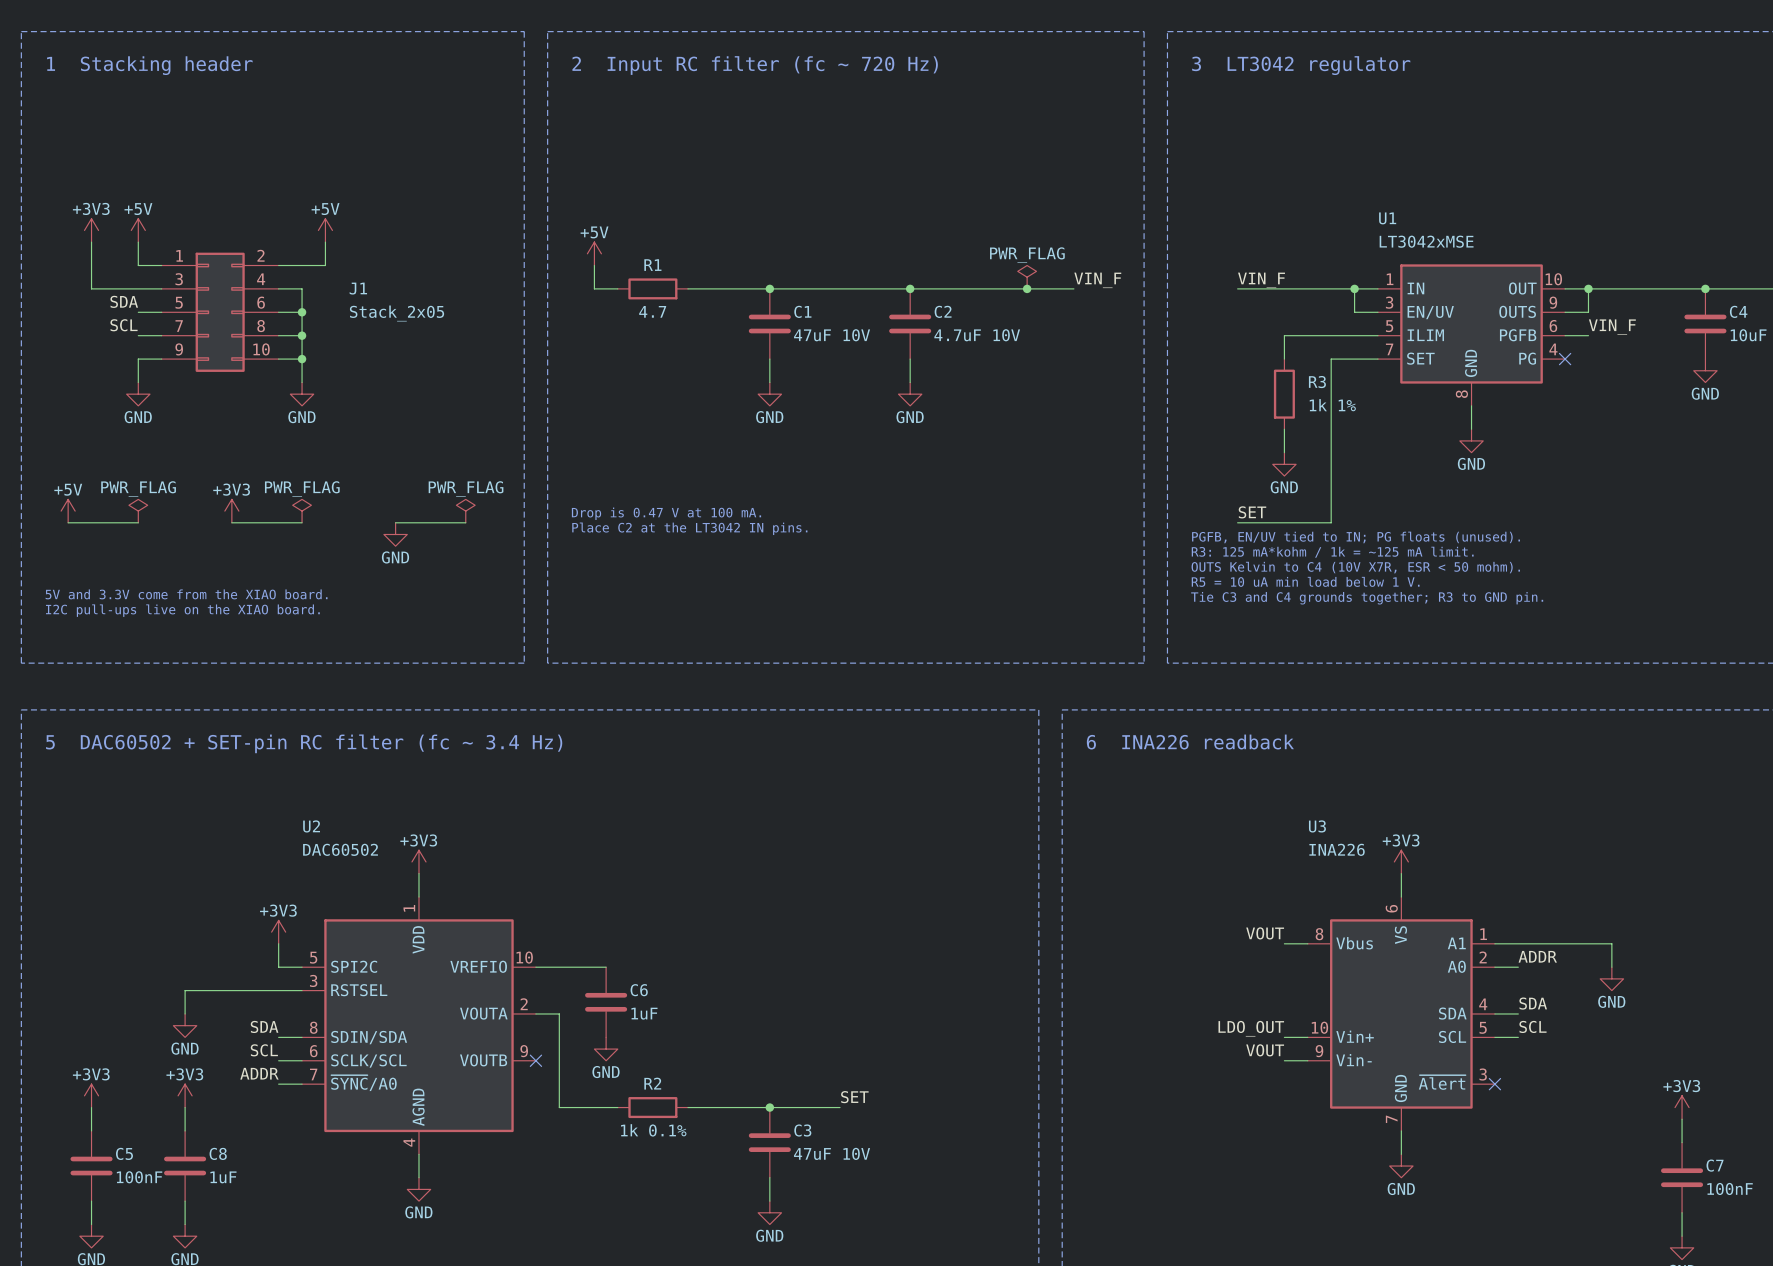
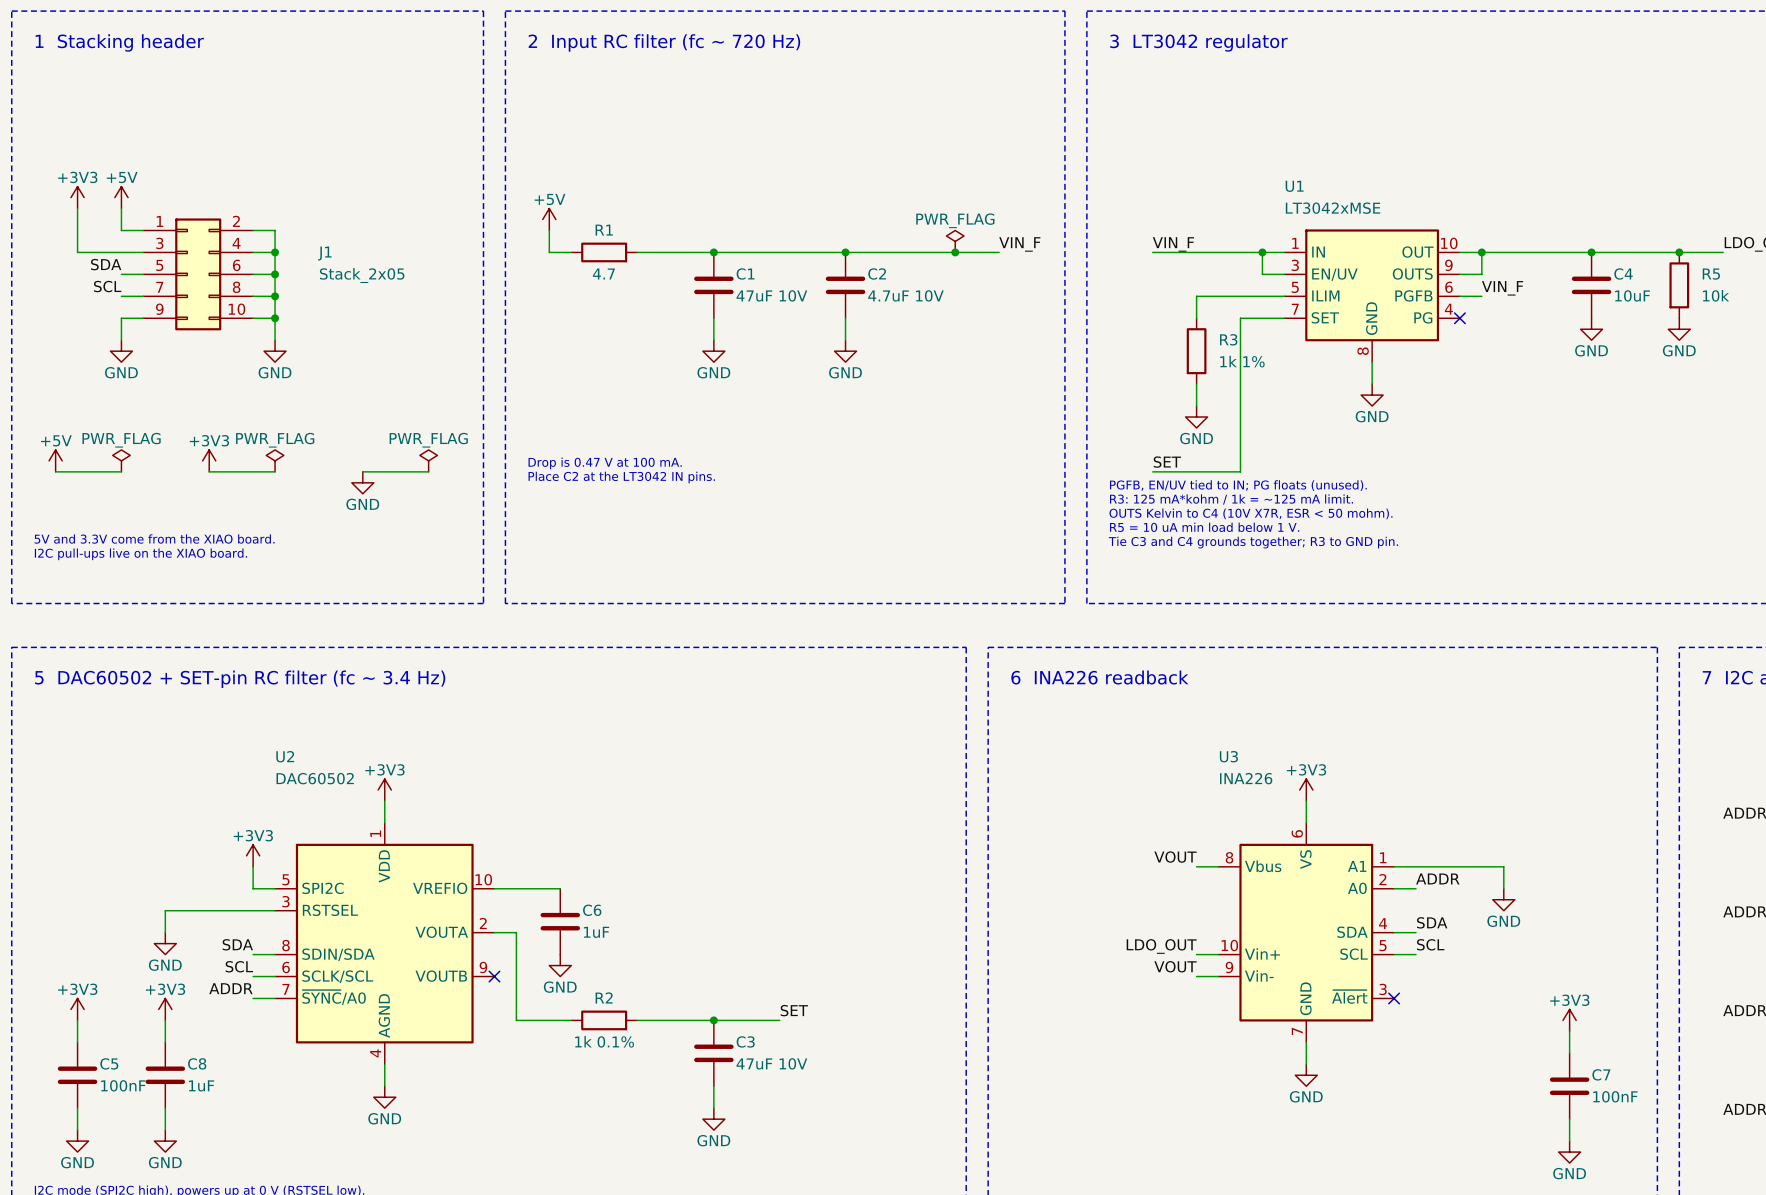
power symbol: +5V (325, 230) -> none
wire: (325, 242) (325, 265) (302, 265) -> (275, 252) (275, 230)
junction: none -> (275, 252)

